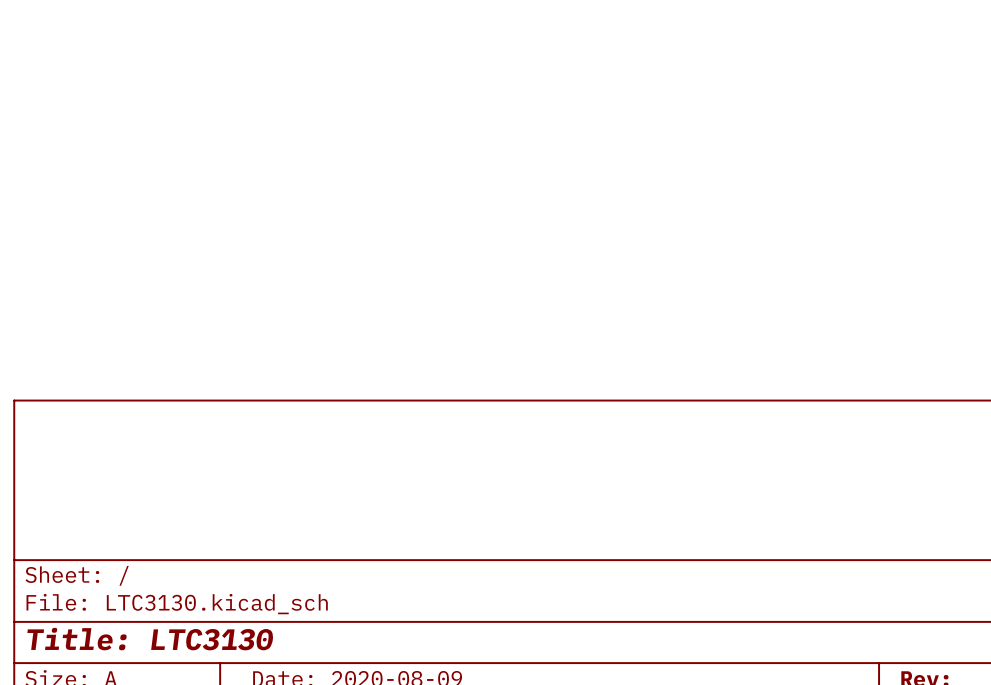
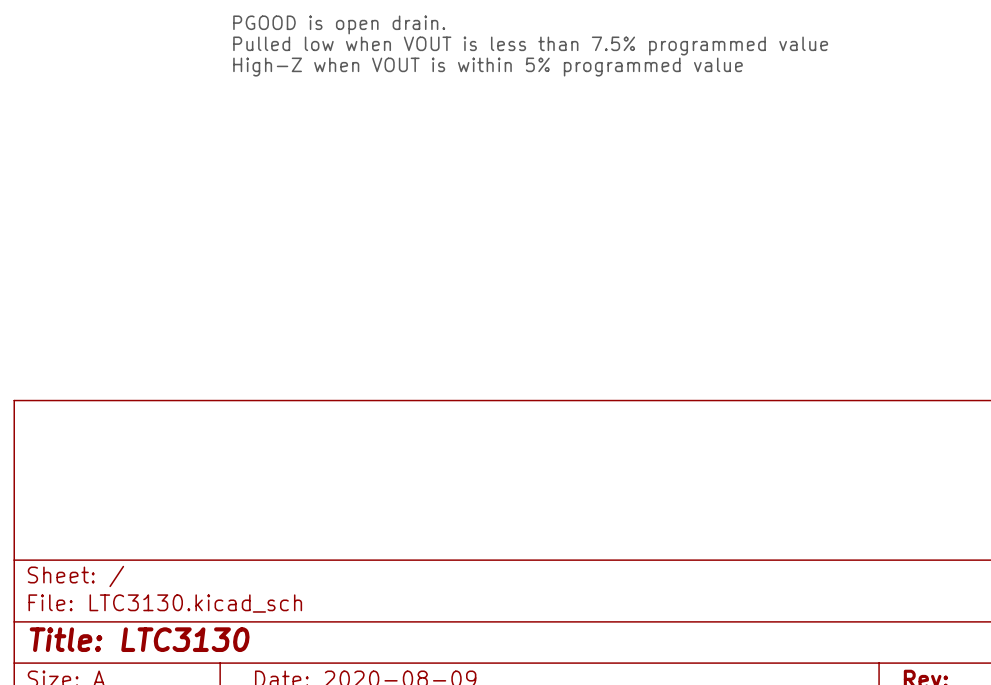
text: none -> PGOOD is open drain. (339, 24)
text: none -> Pulled low when VOUT is less than 7.5% programmed value (530, 45)
text: none -> High-Z when VOUT is within 5% programmed value (488, 67)

